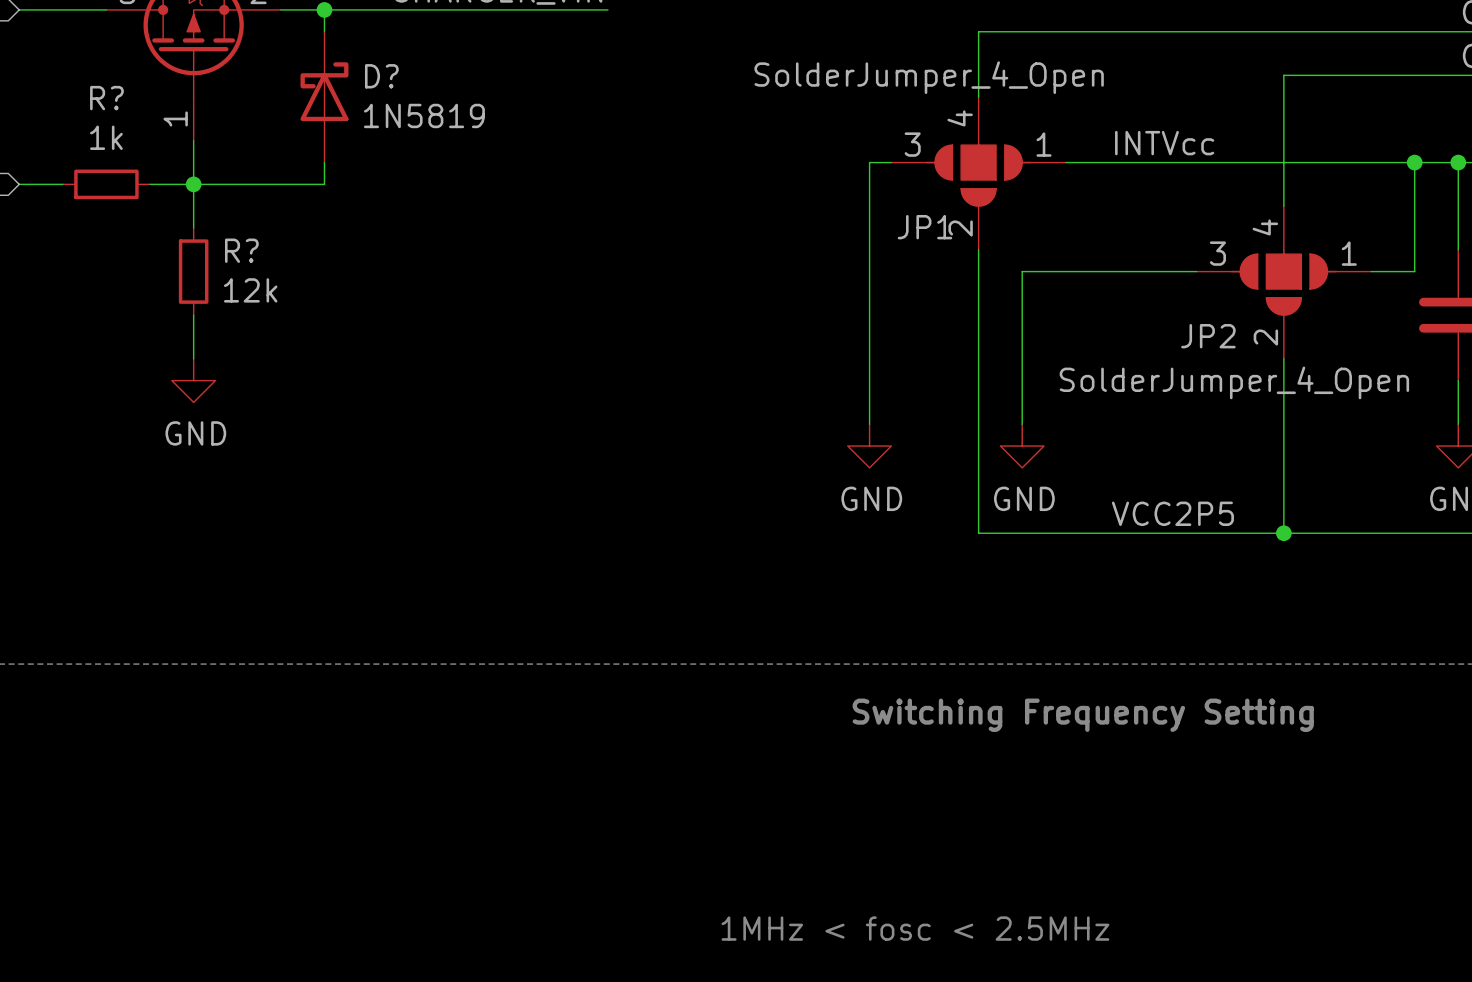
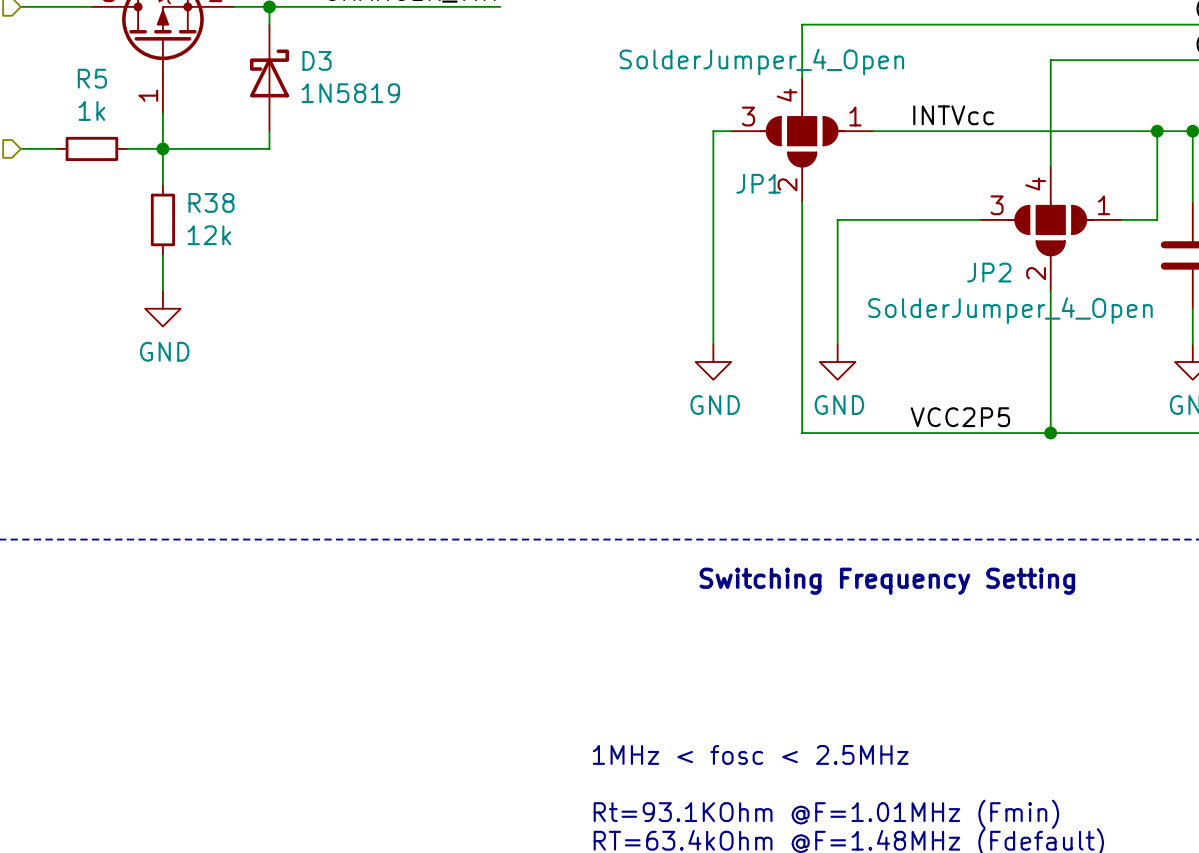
D? name: D? (381, 76) -> D3 (317, 60)
R? name: R? (106, 98) -> R5 (92, 78)
R? name: R? (241, 250) -> R38 (211, 202)

